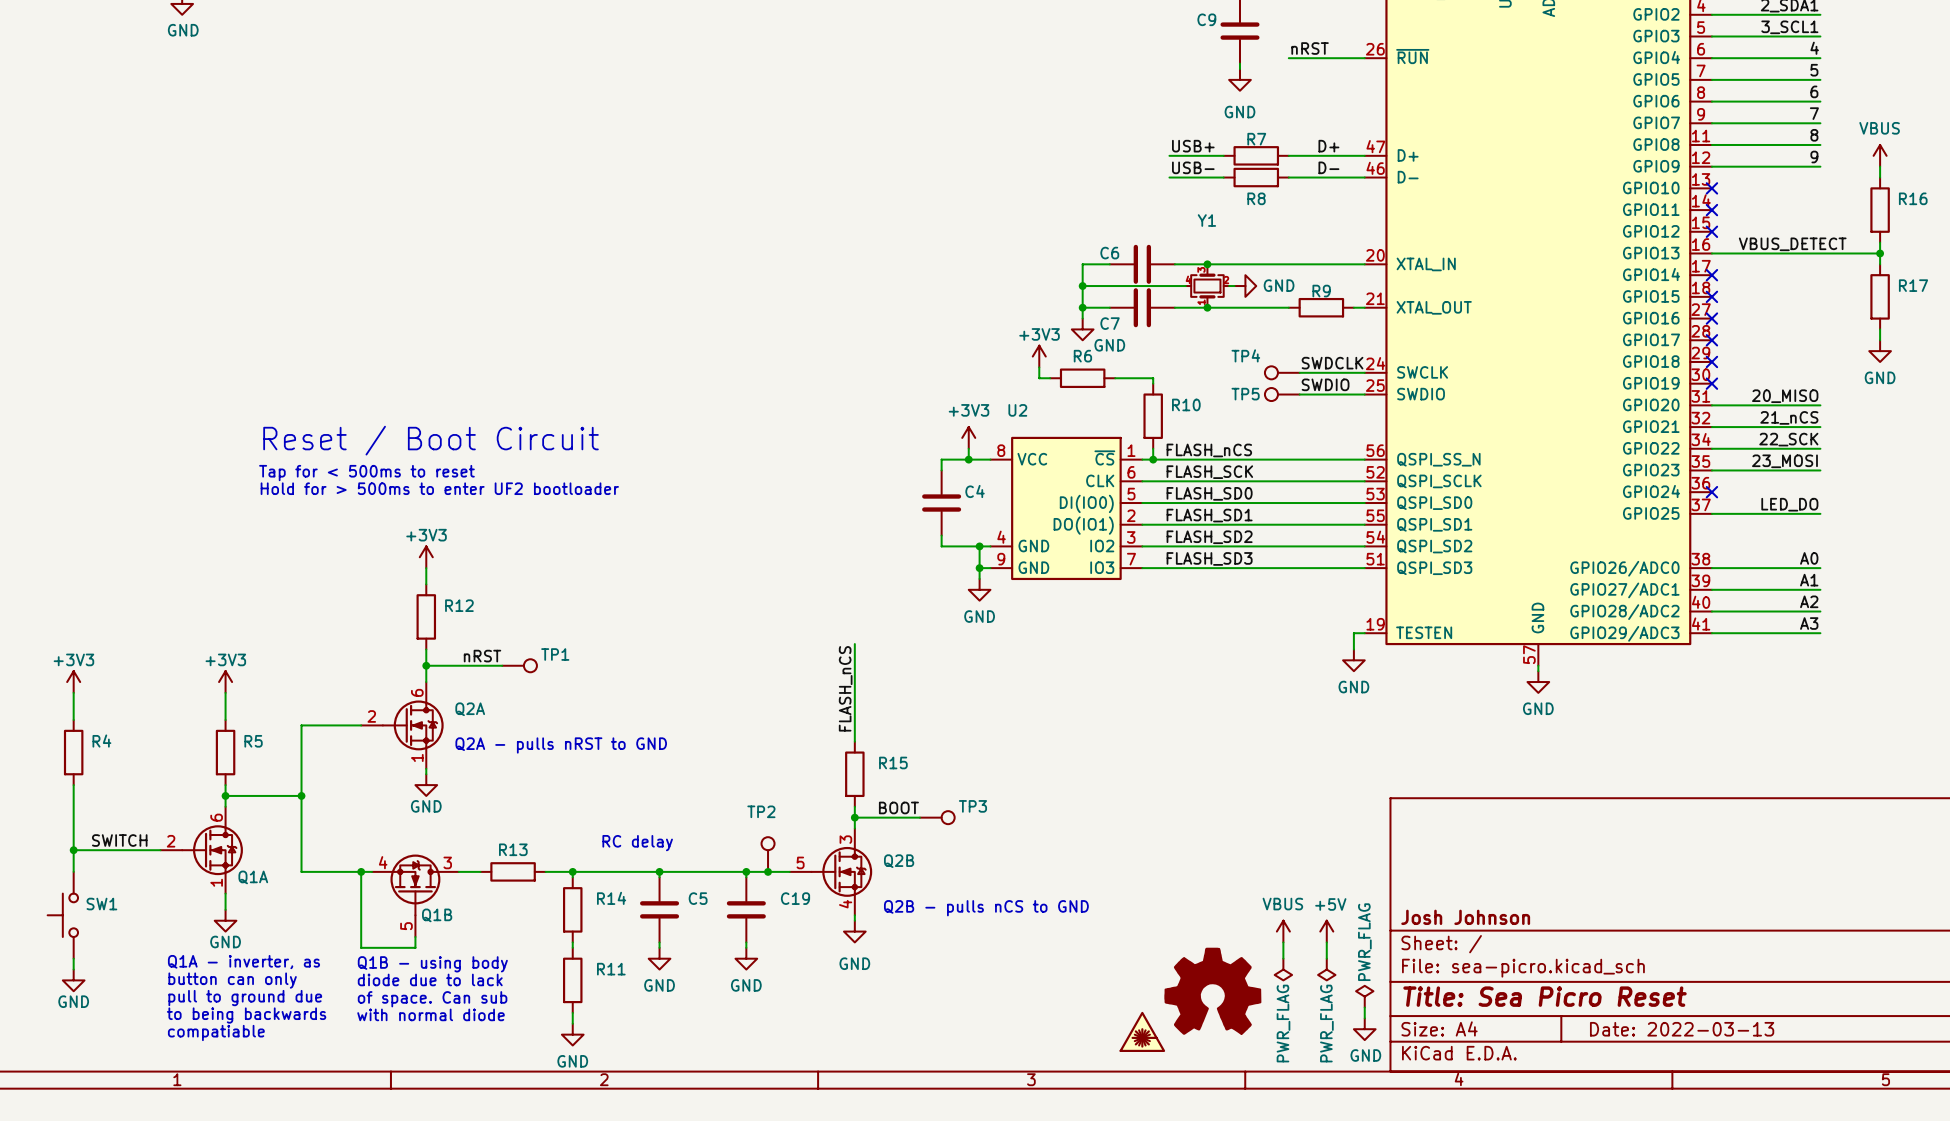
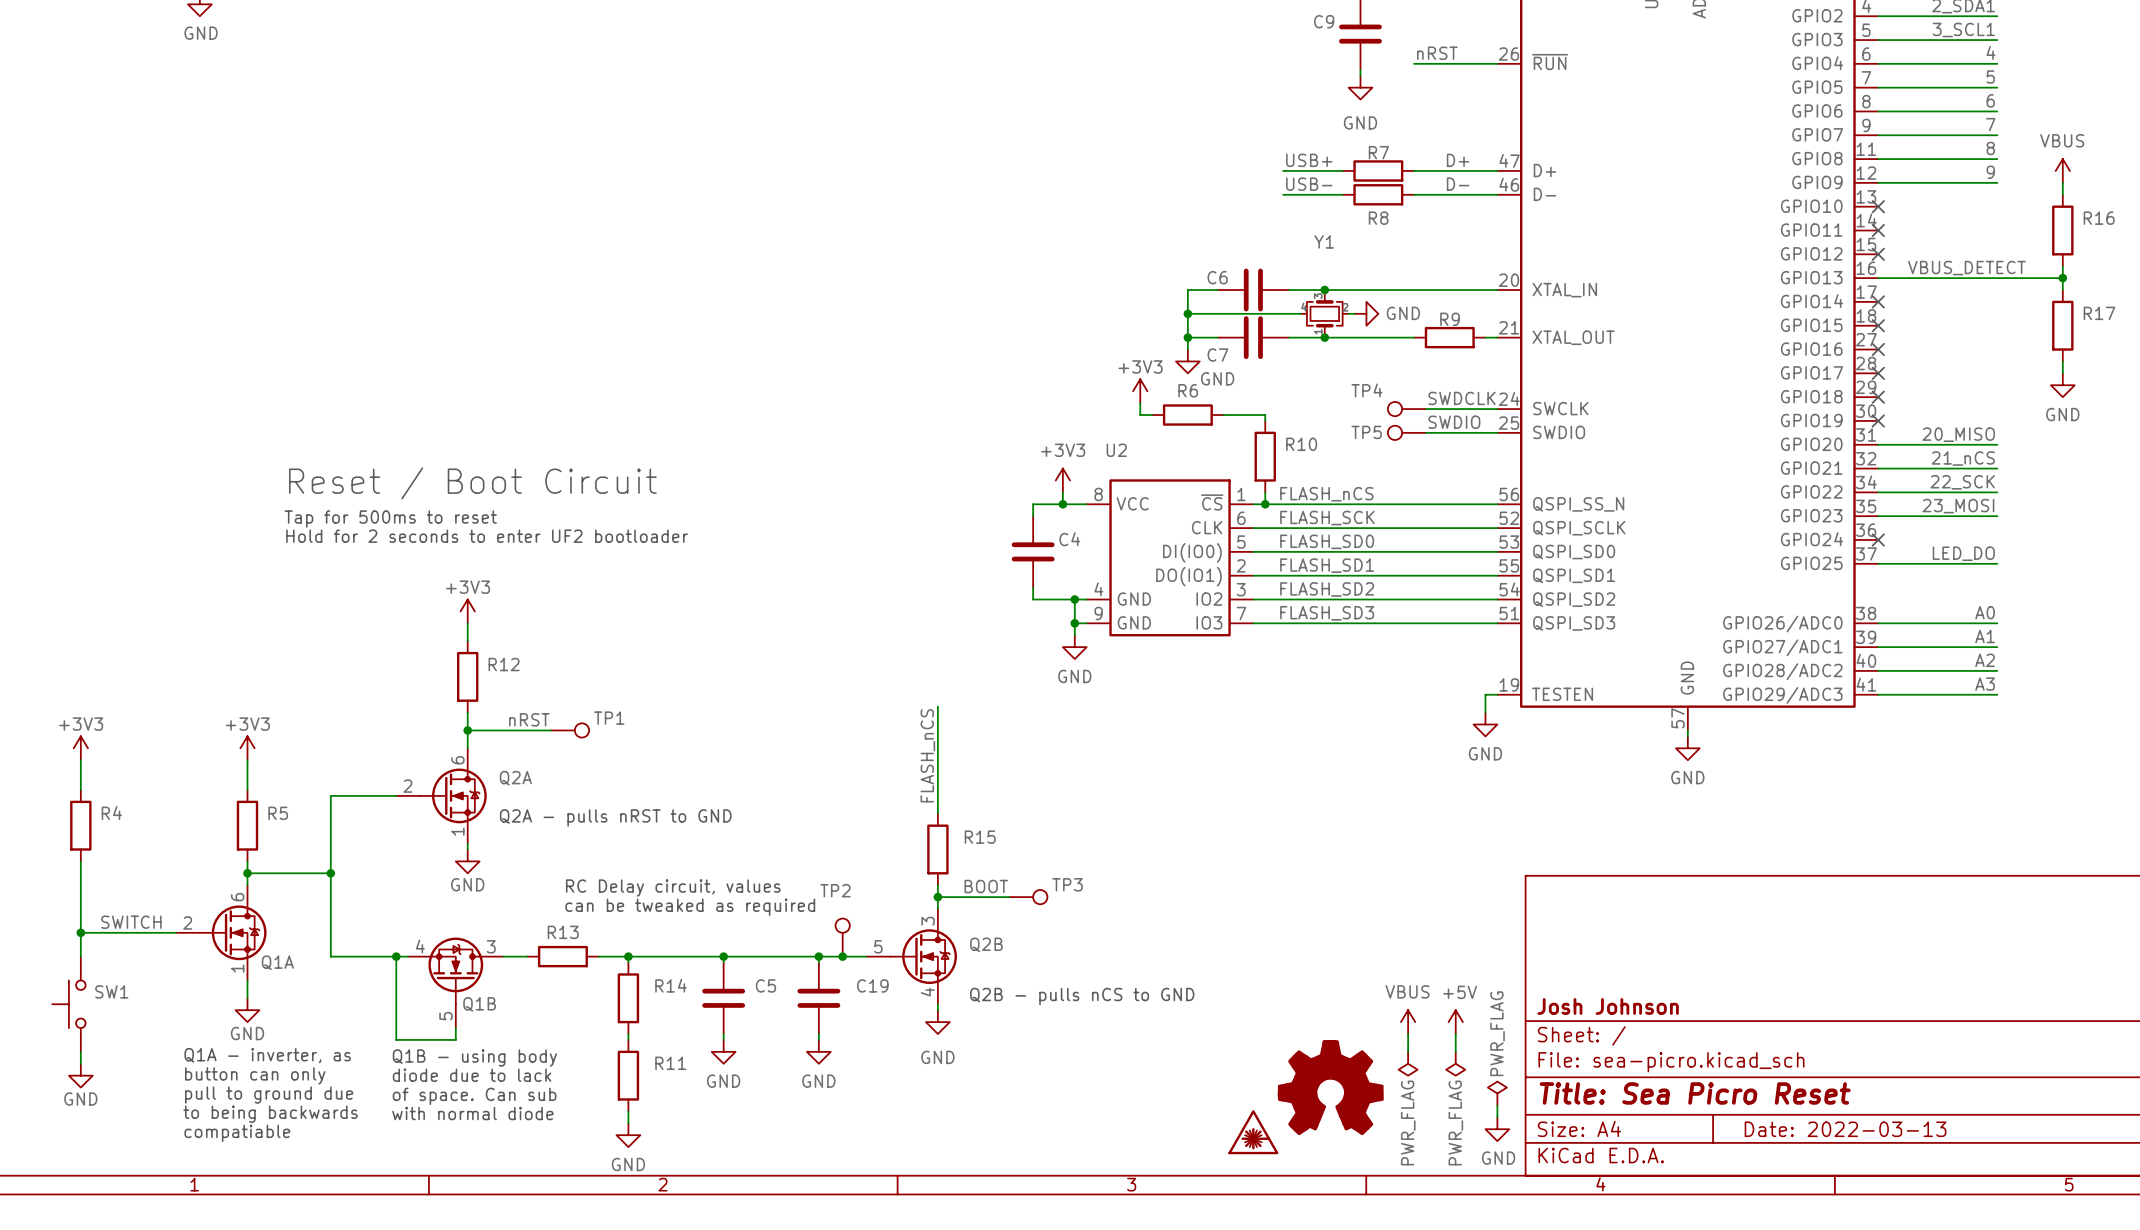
text: Tap for < 500ms to reset (366, 473) -> Tap for 500ms to reset (390, 519)
text: Hold for > 500ms to enter UF2 bootloader (439, 488) -> Hold for 2 seconds to enter UF2 bootloader (487, 536)
text: none -> RC Delay circuit, values (673, 888)
text: none -> can be tweaked as required (690, 907)
text: RC delay (637, 843) -> none

